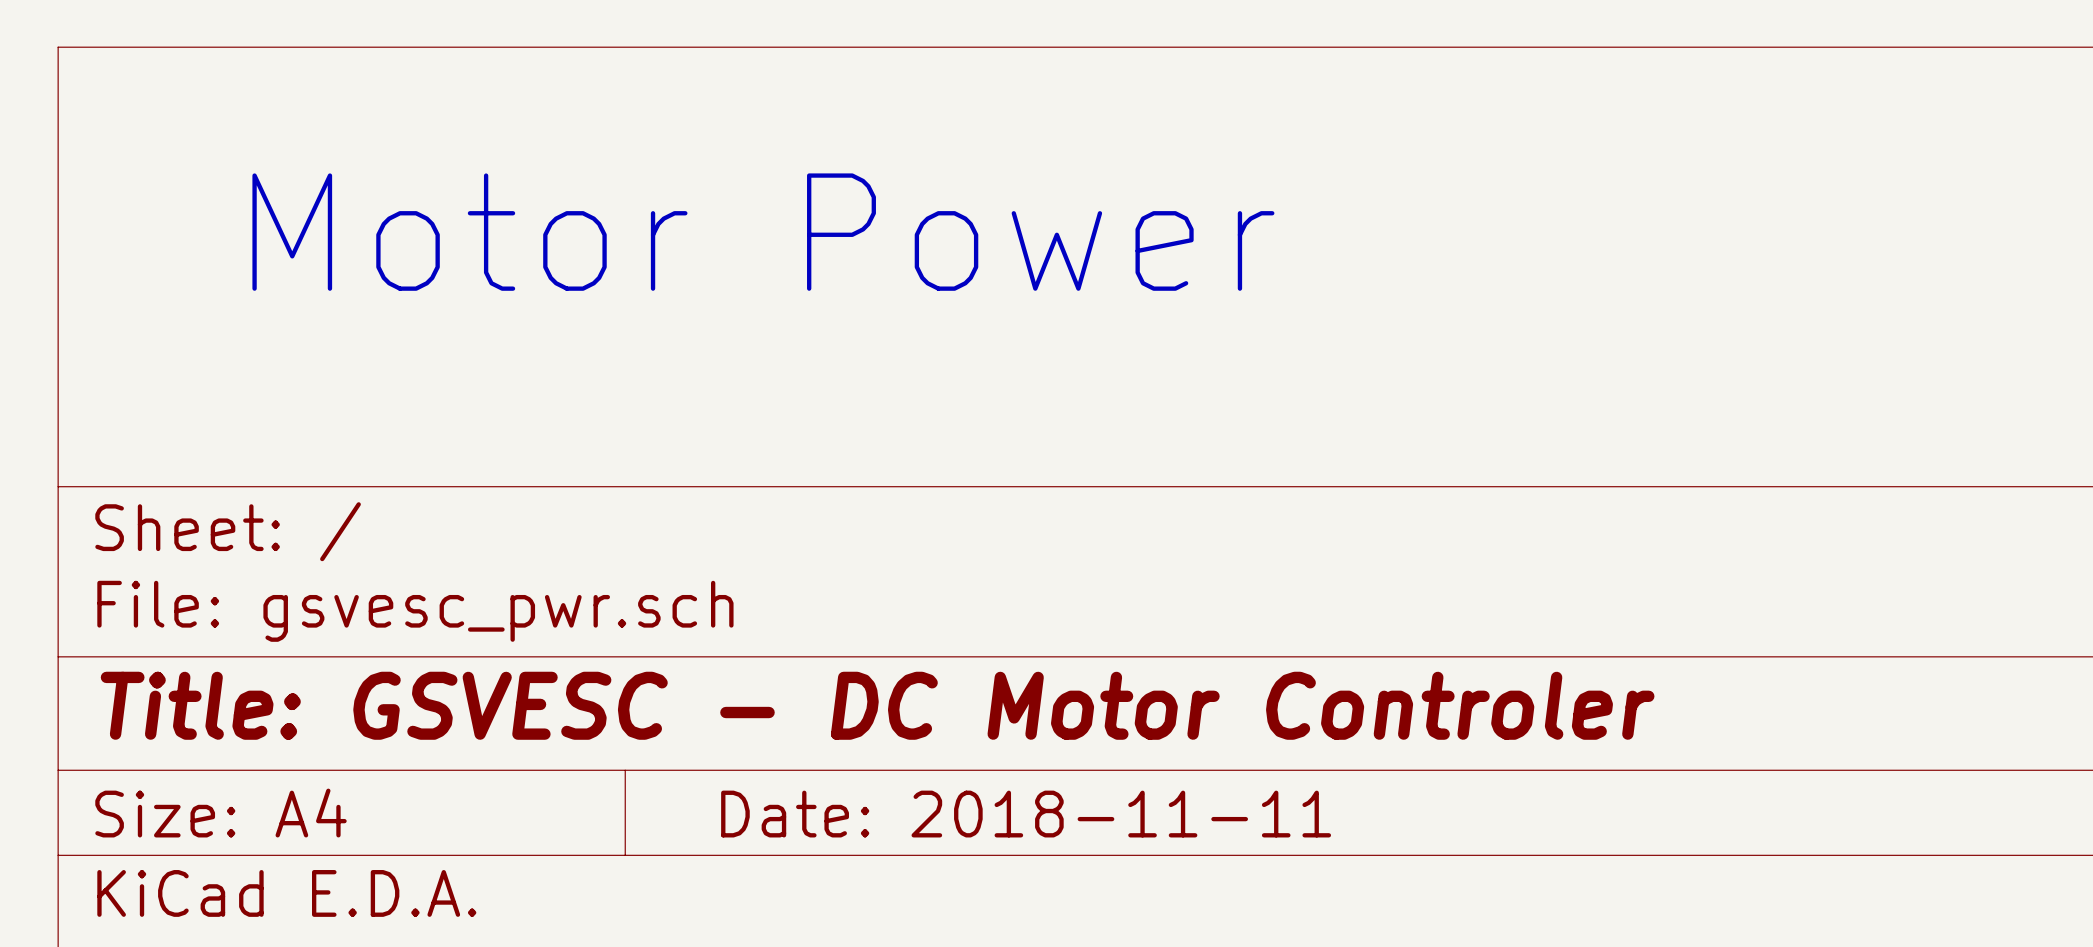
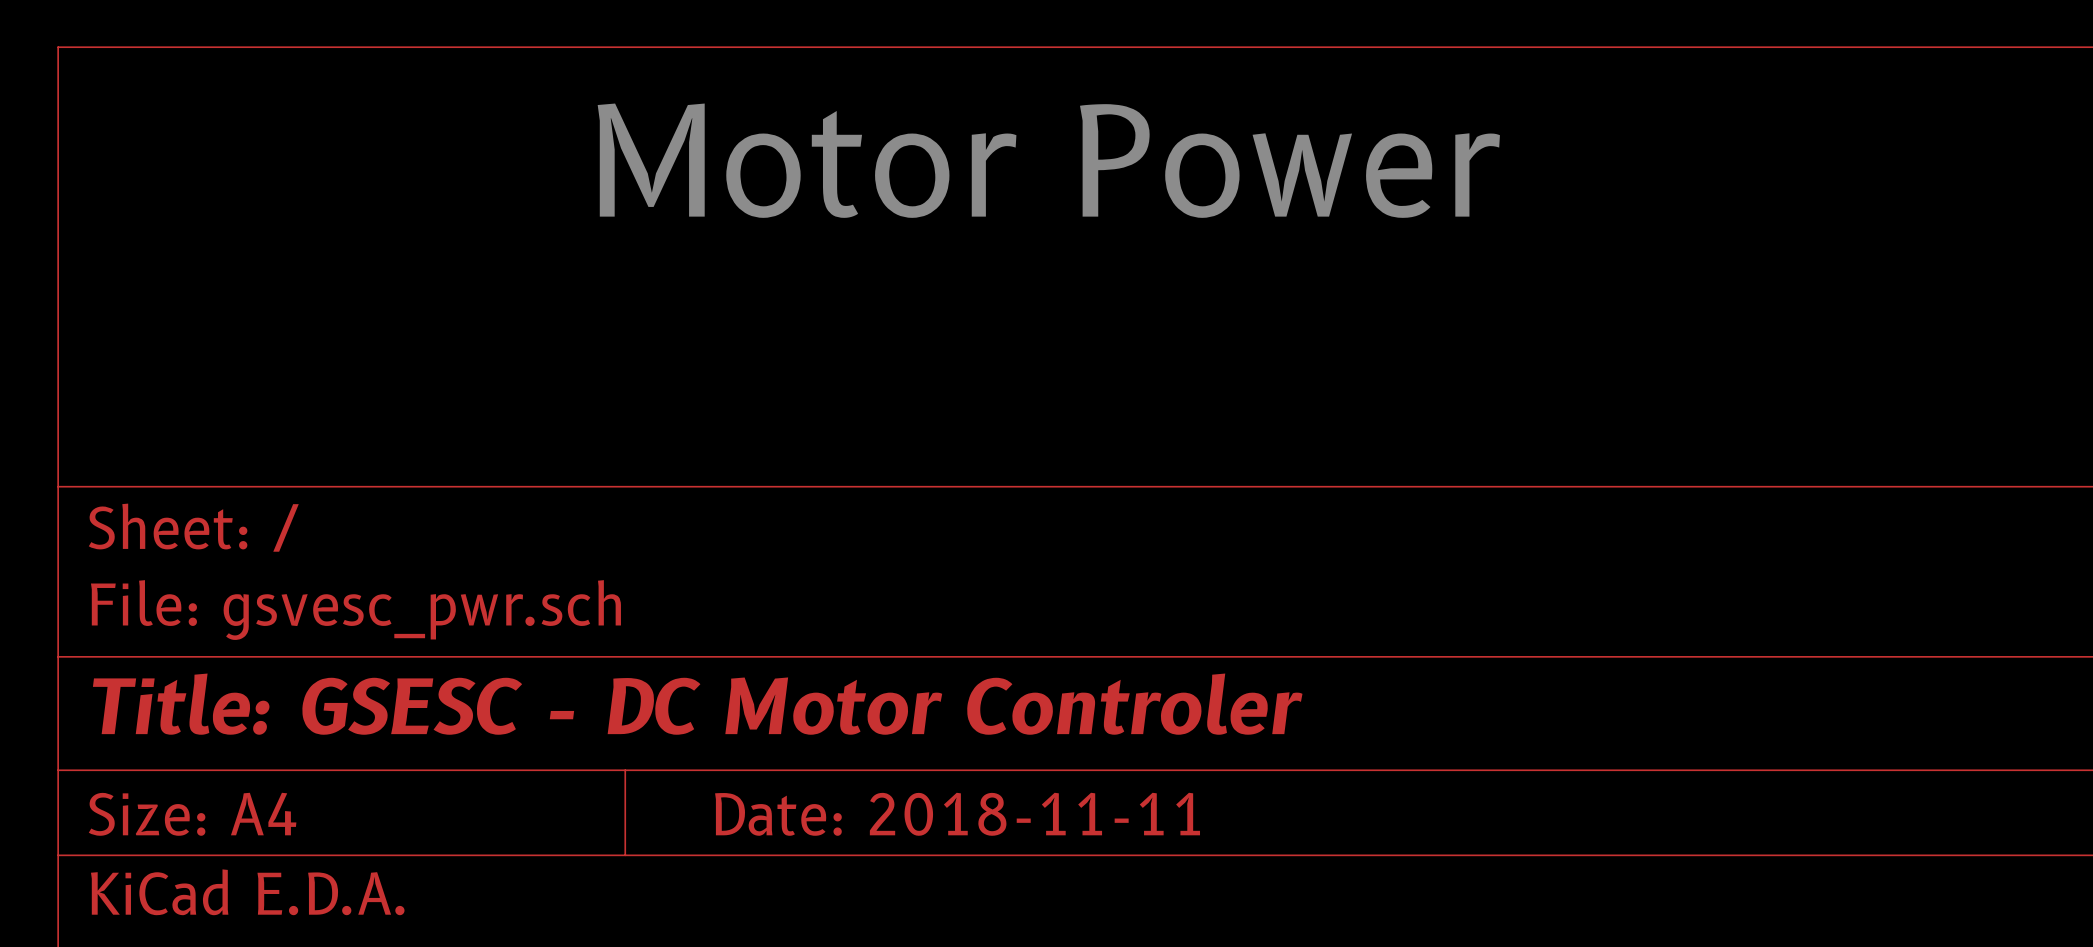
text position: Motor Power (763, 232) -> Motor Power (1048, 160)
title block: Title: GSVESC - DC Motor Controler (877, 705) -> Title: GSESC - DC Motor Controler (697, 704)

